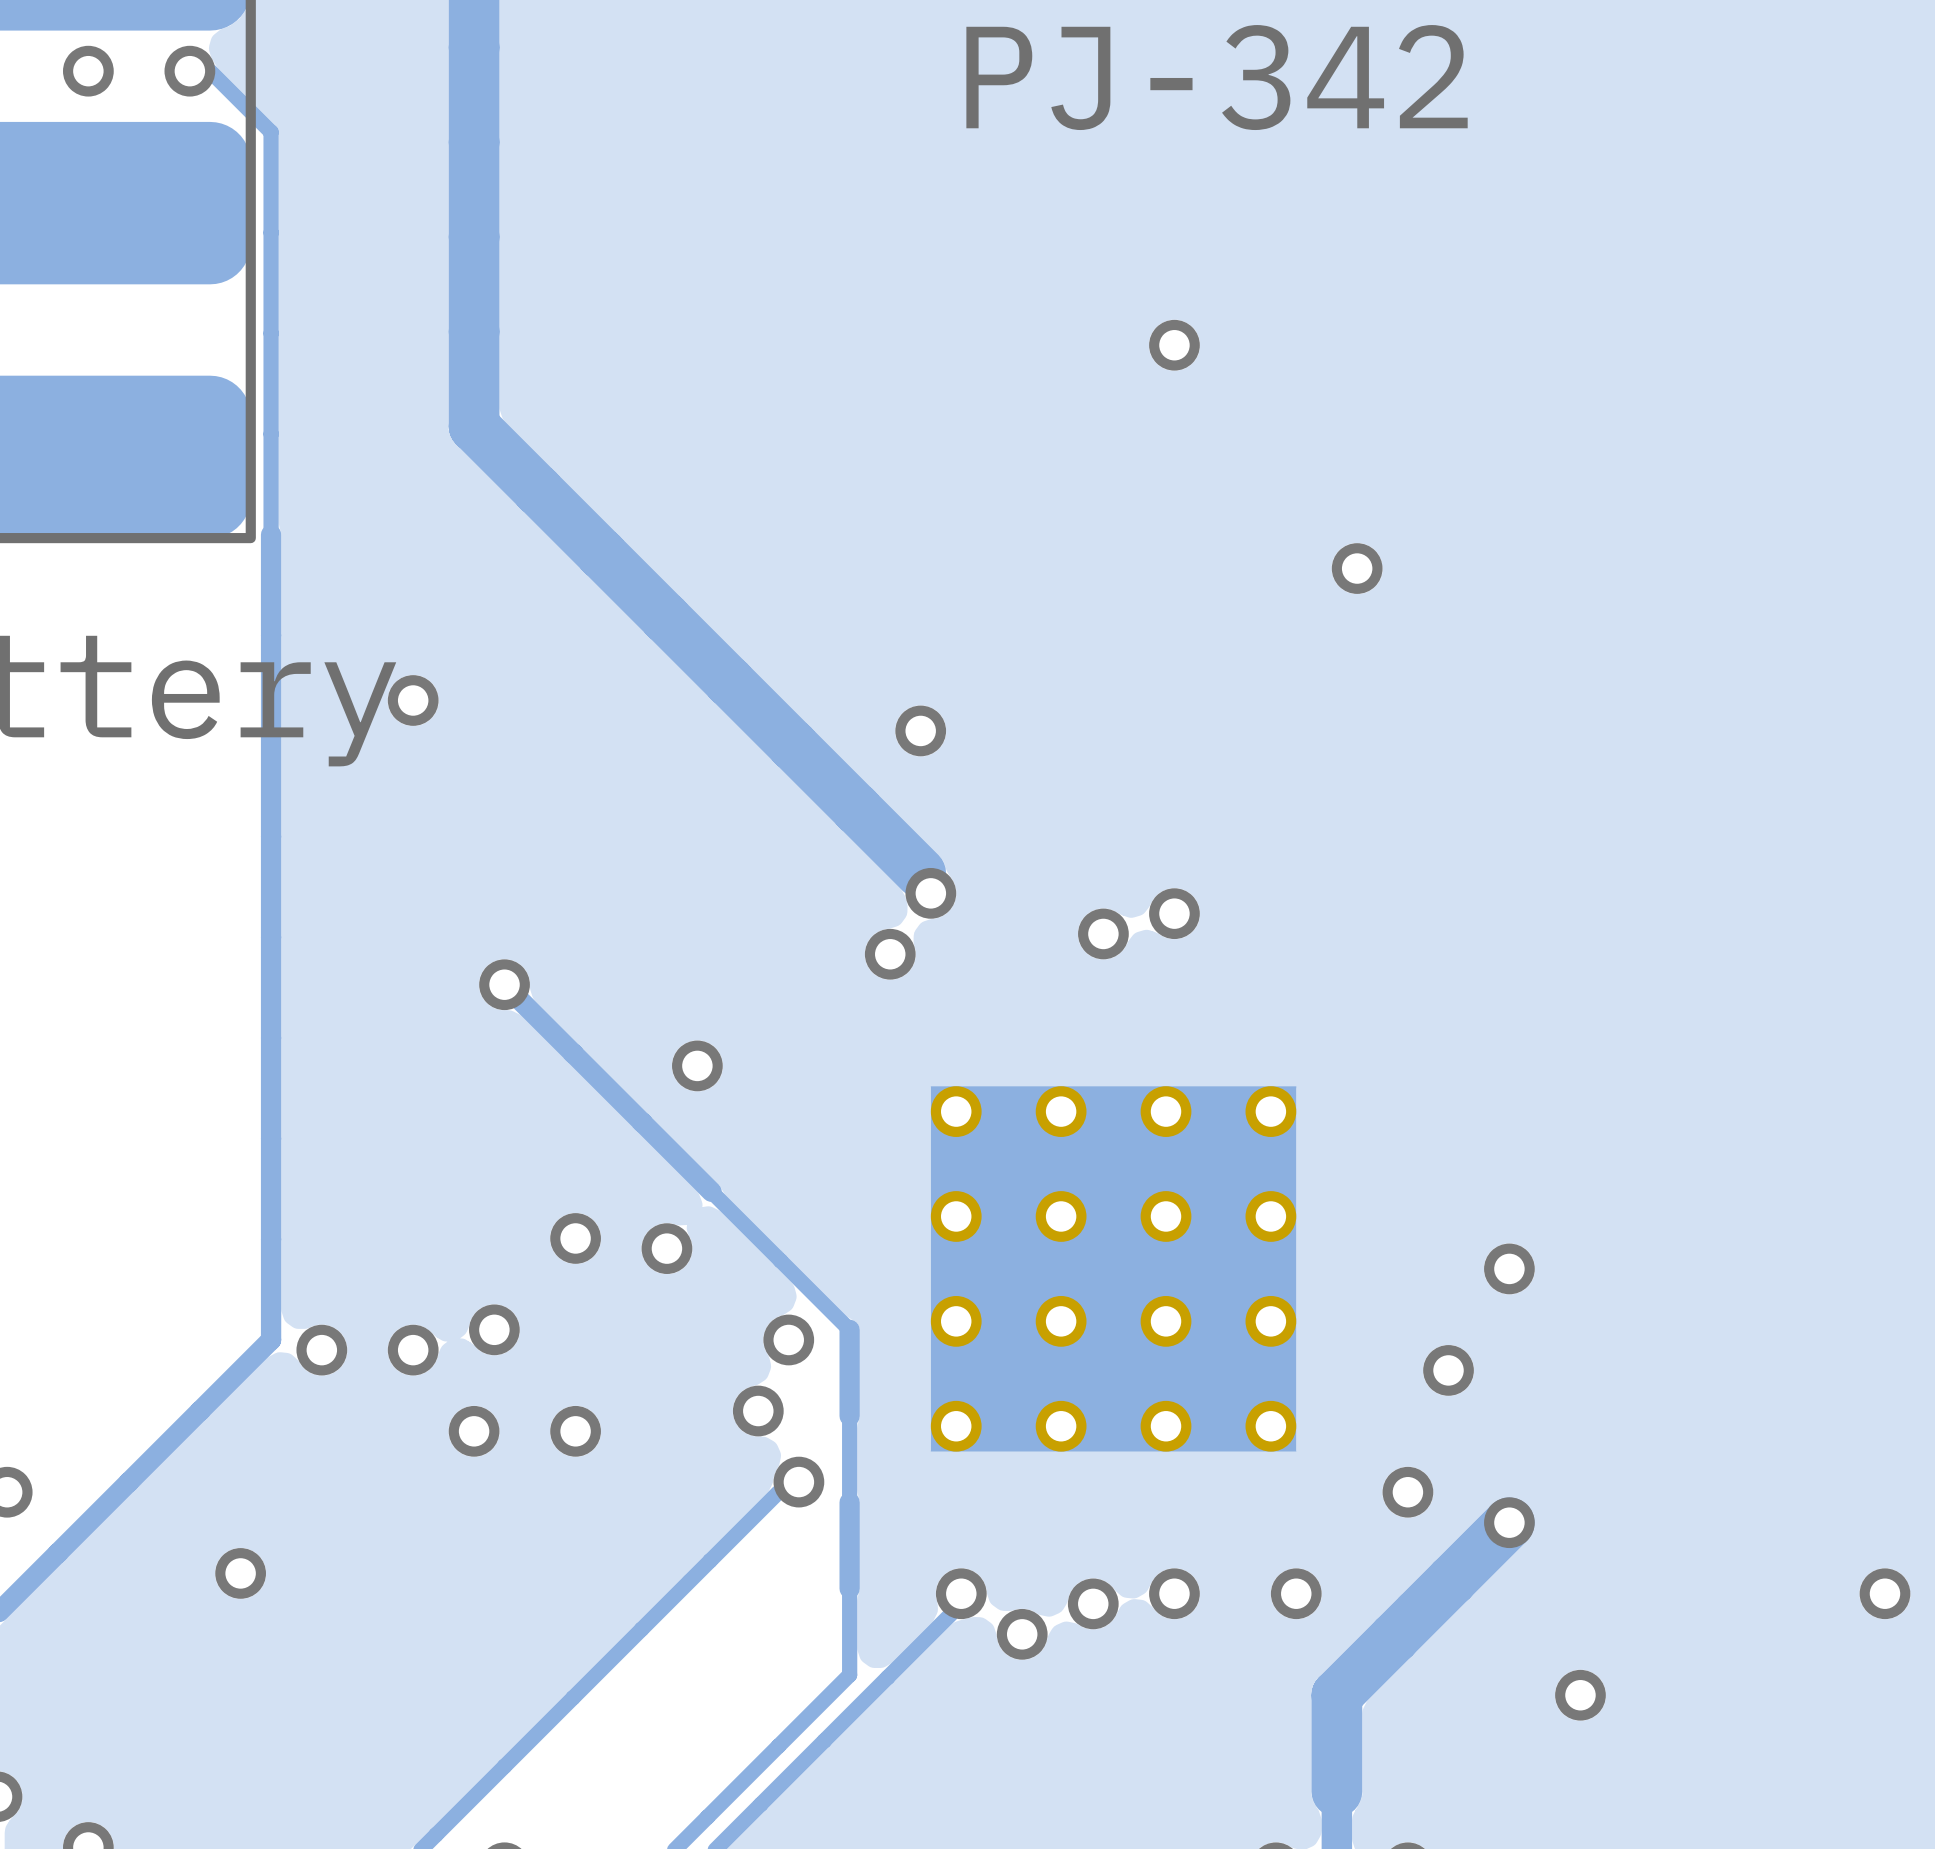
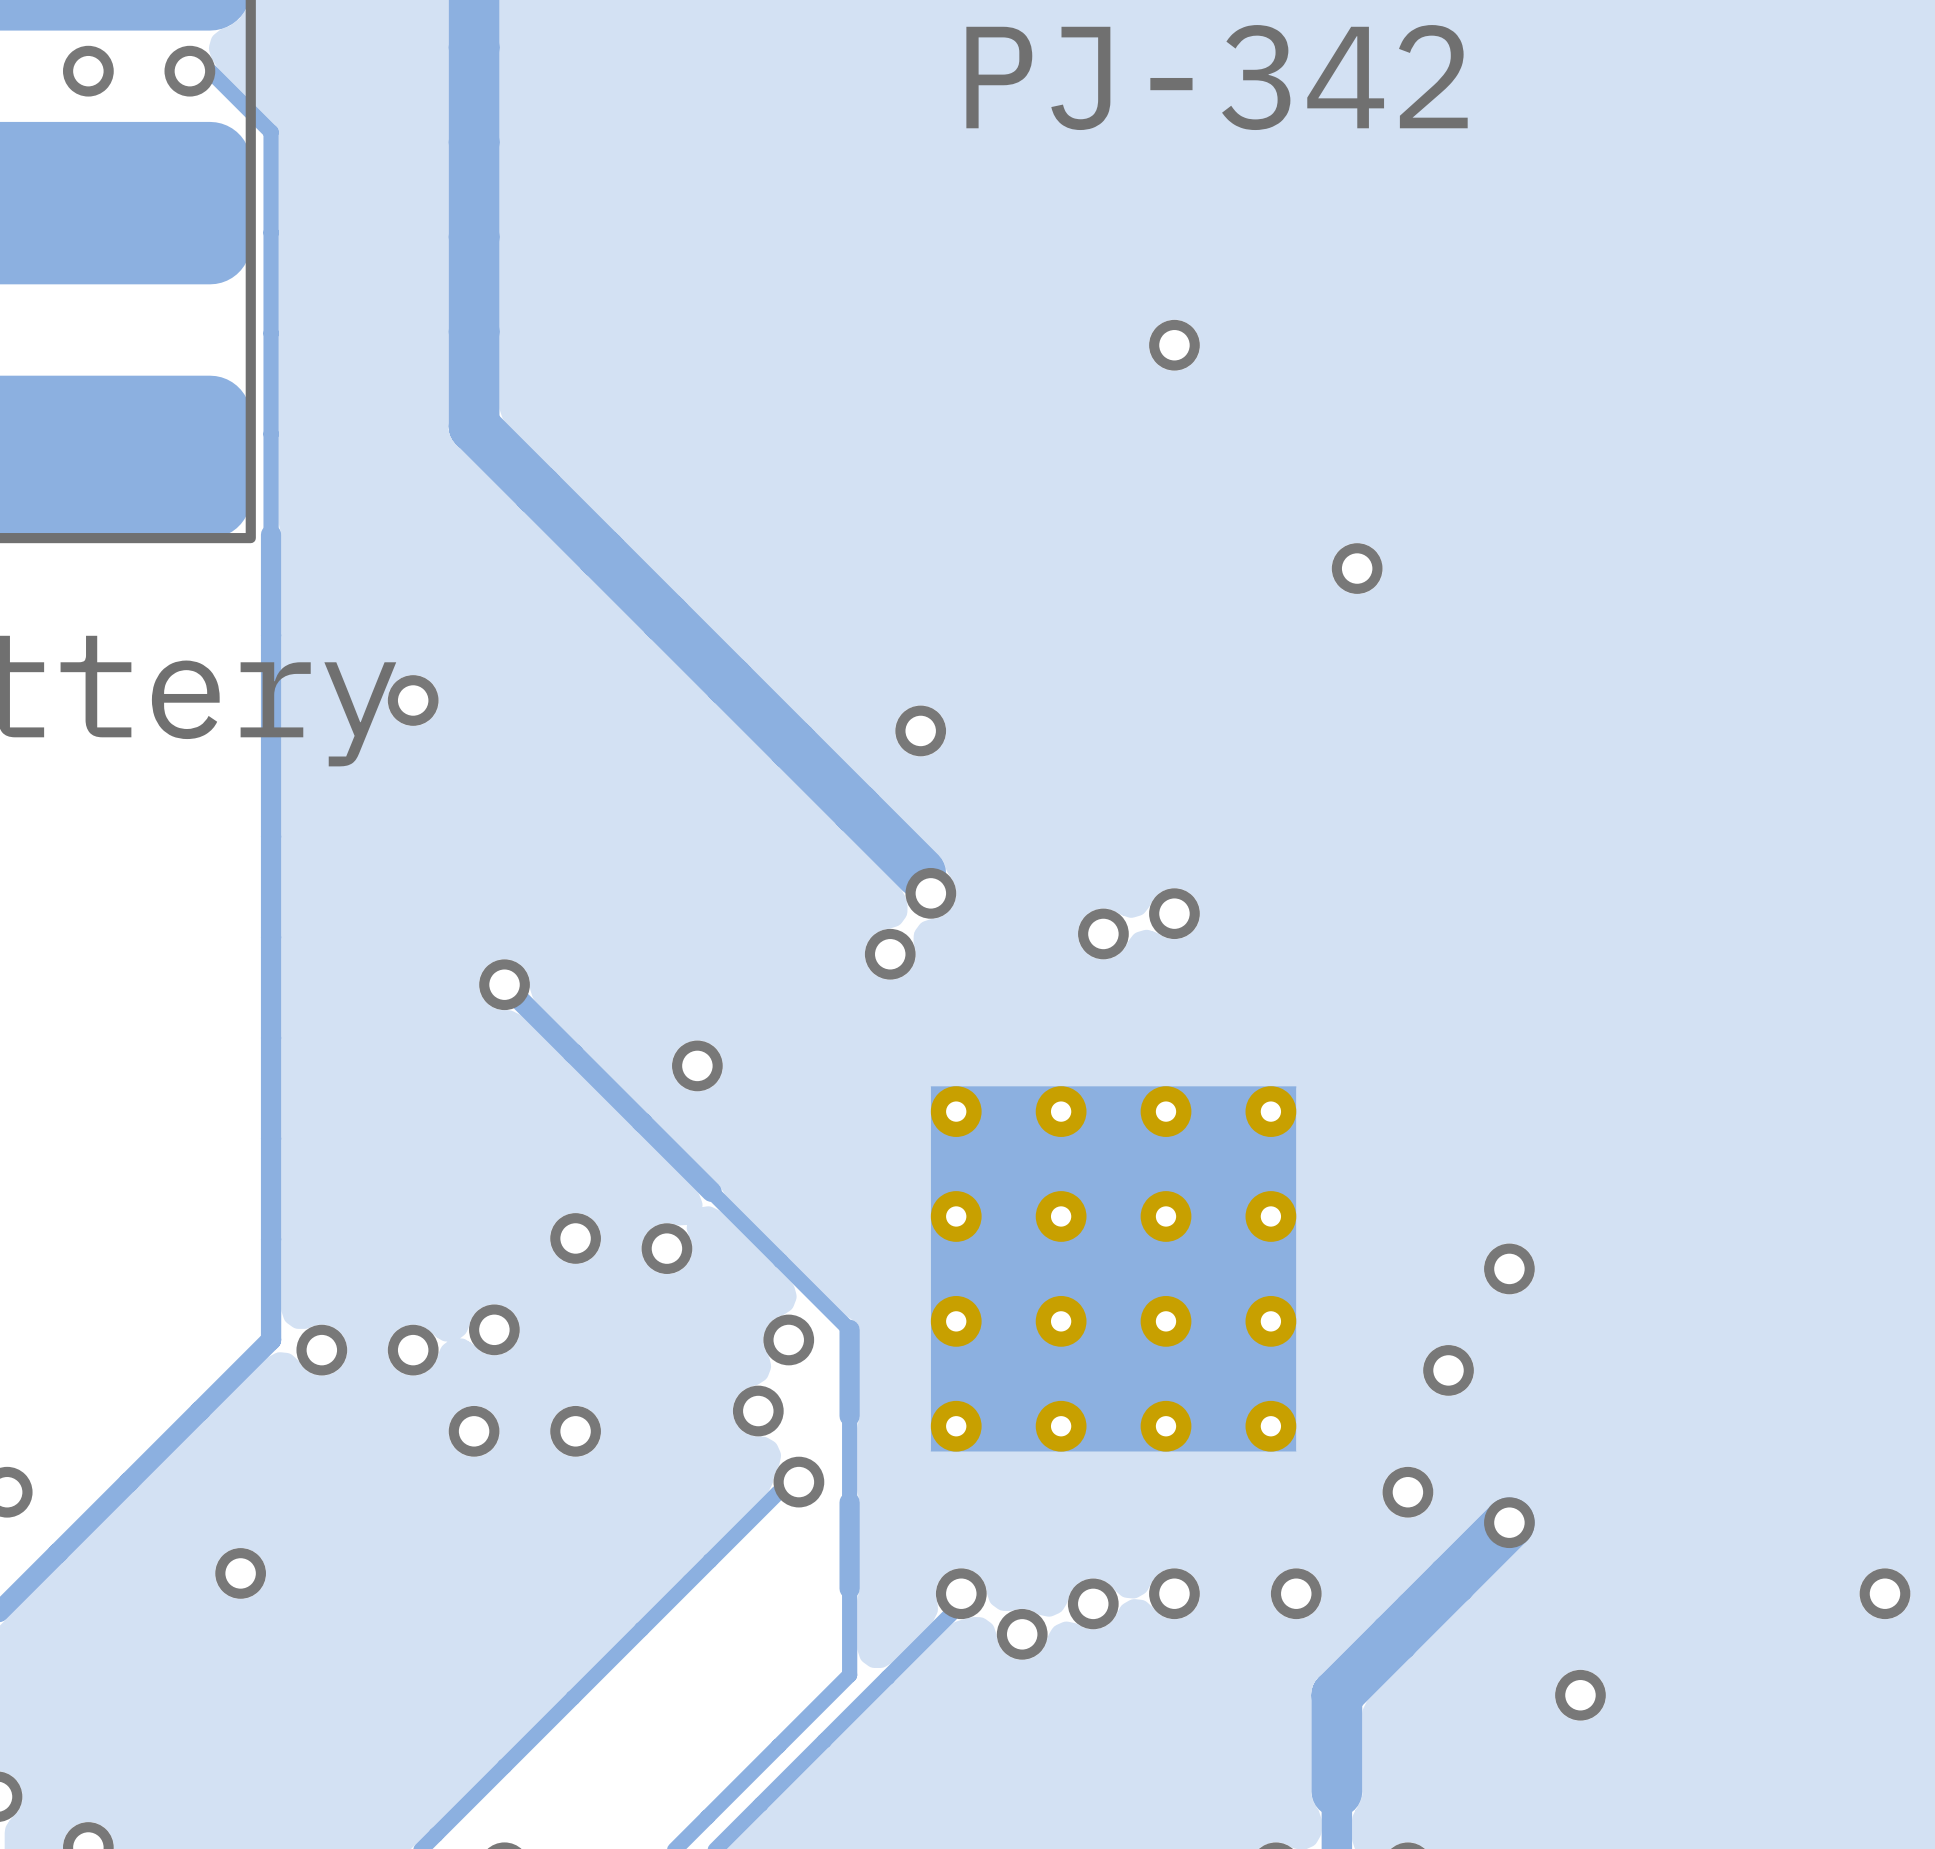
part footprint: [930, 1086, 1297, 1452] -> [930, 1086, 1297, 1452]

